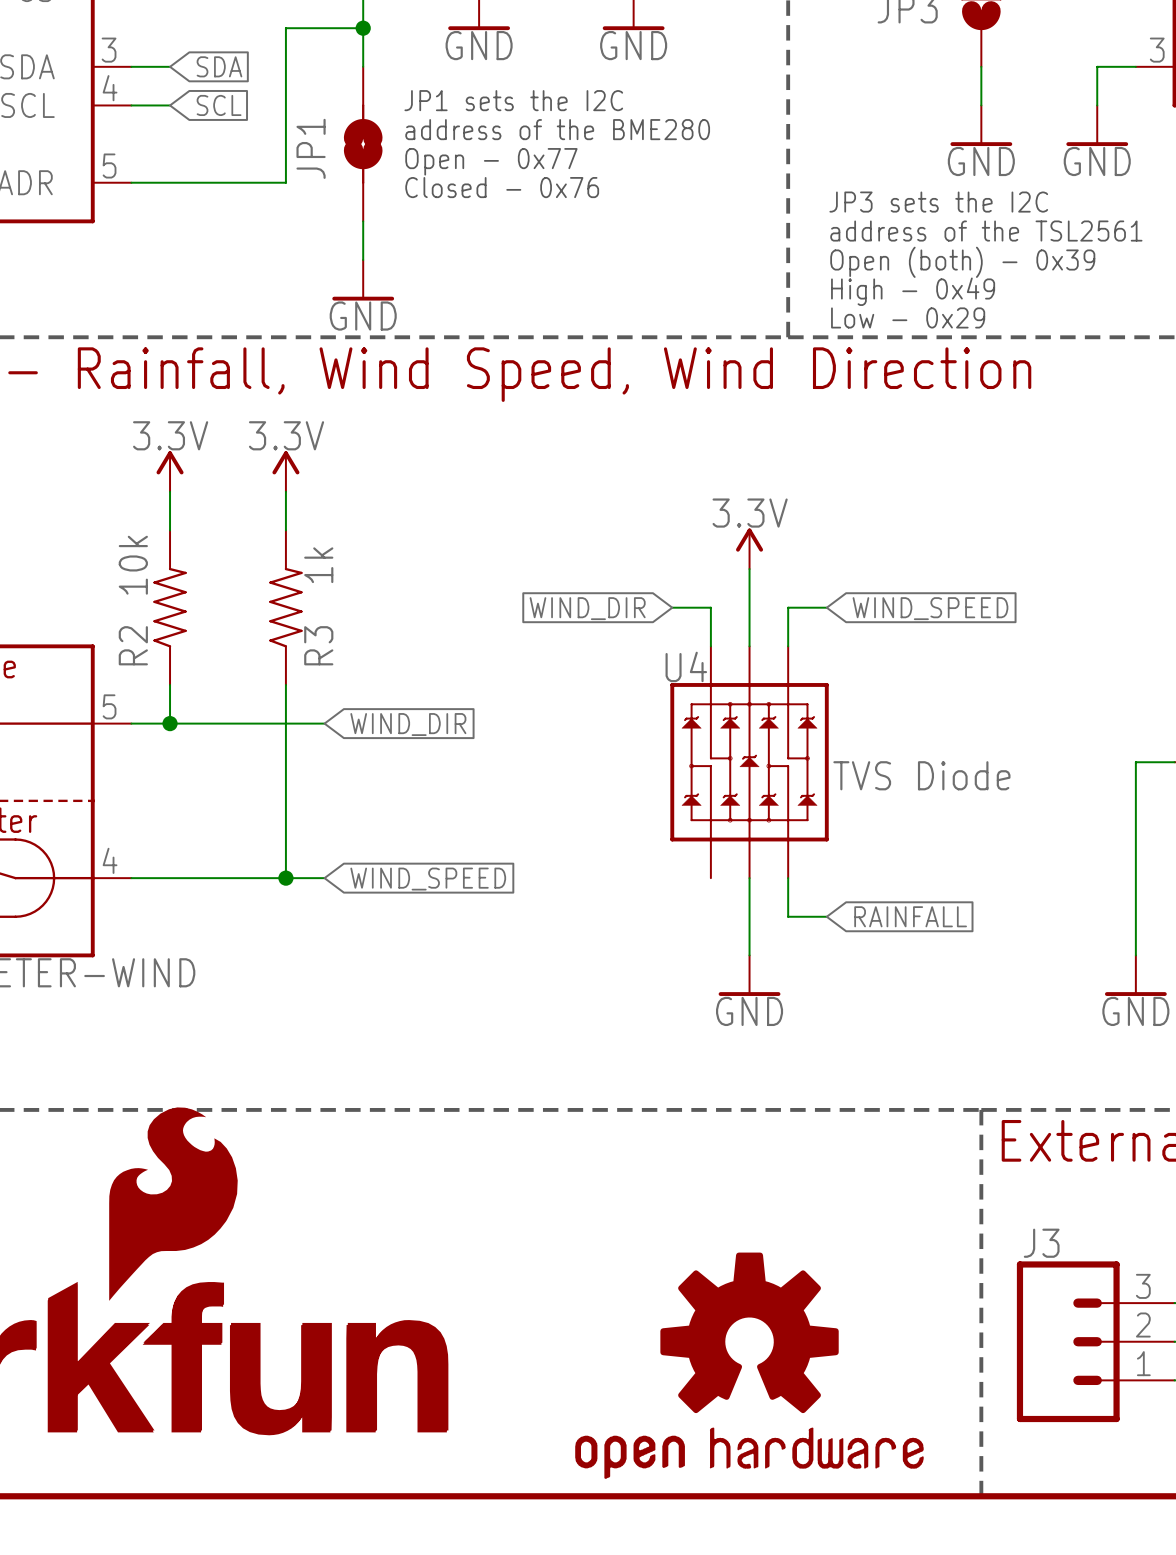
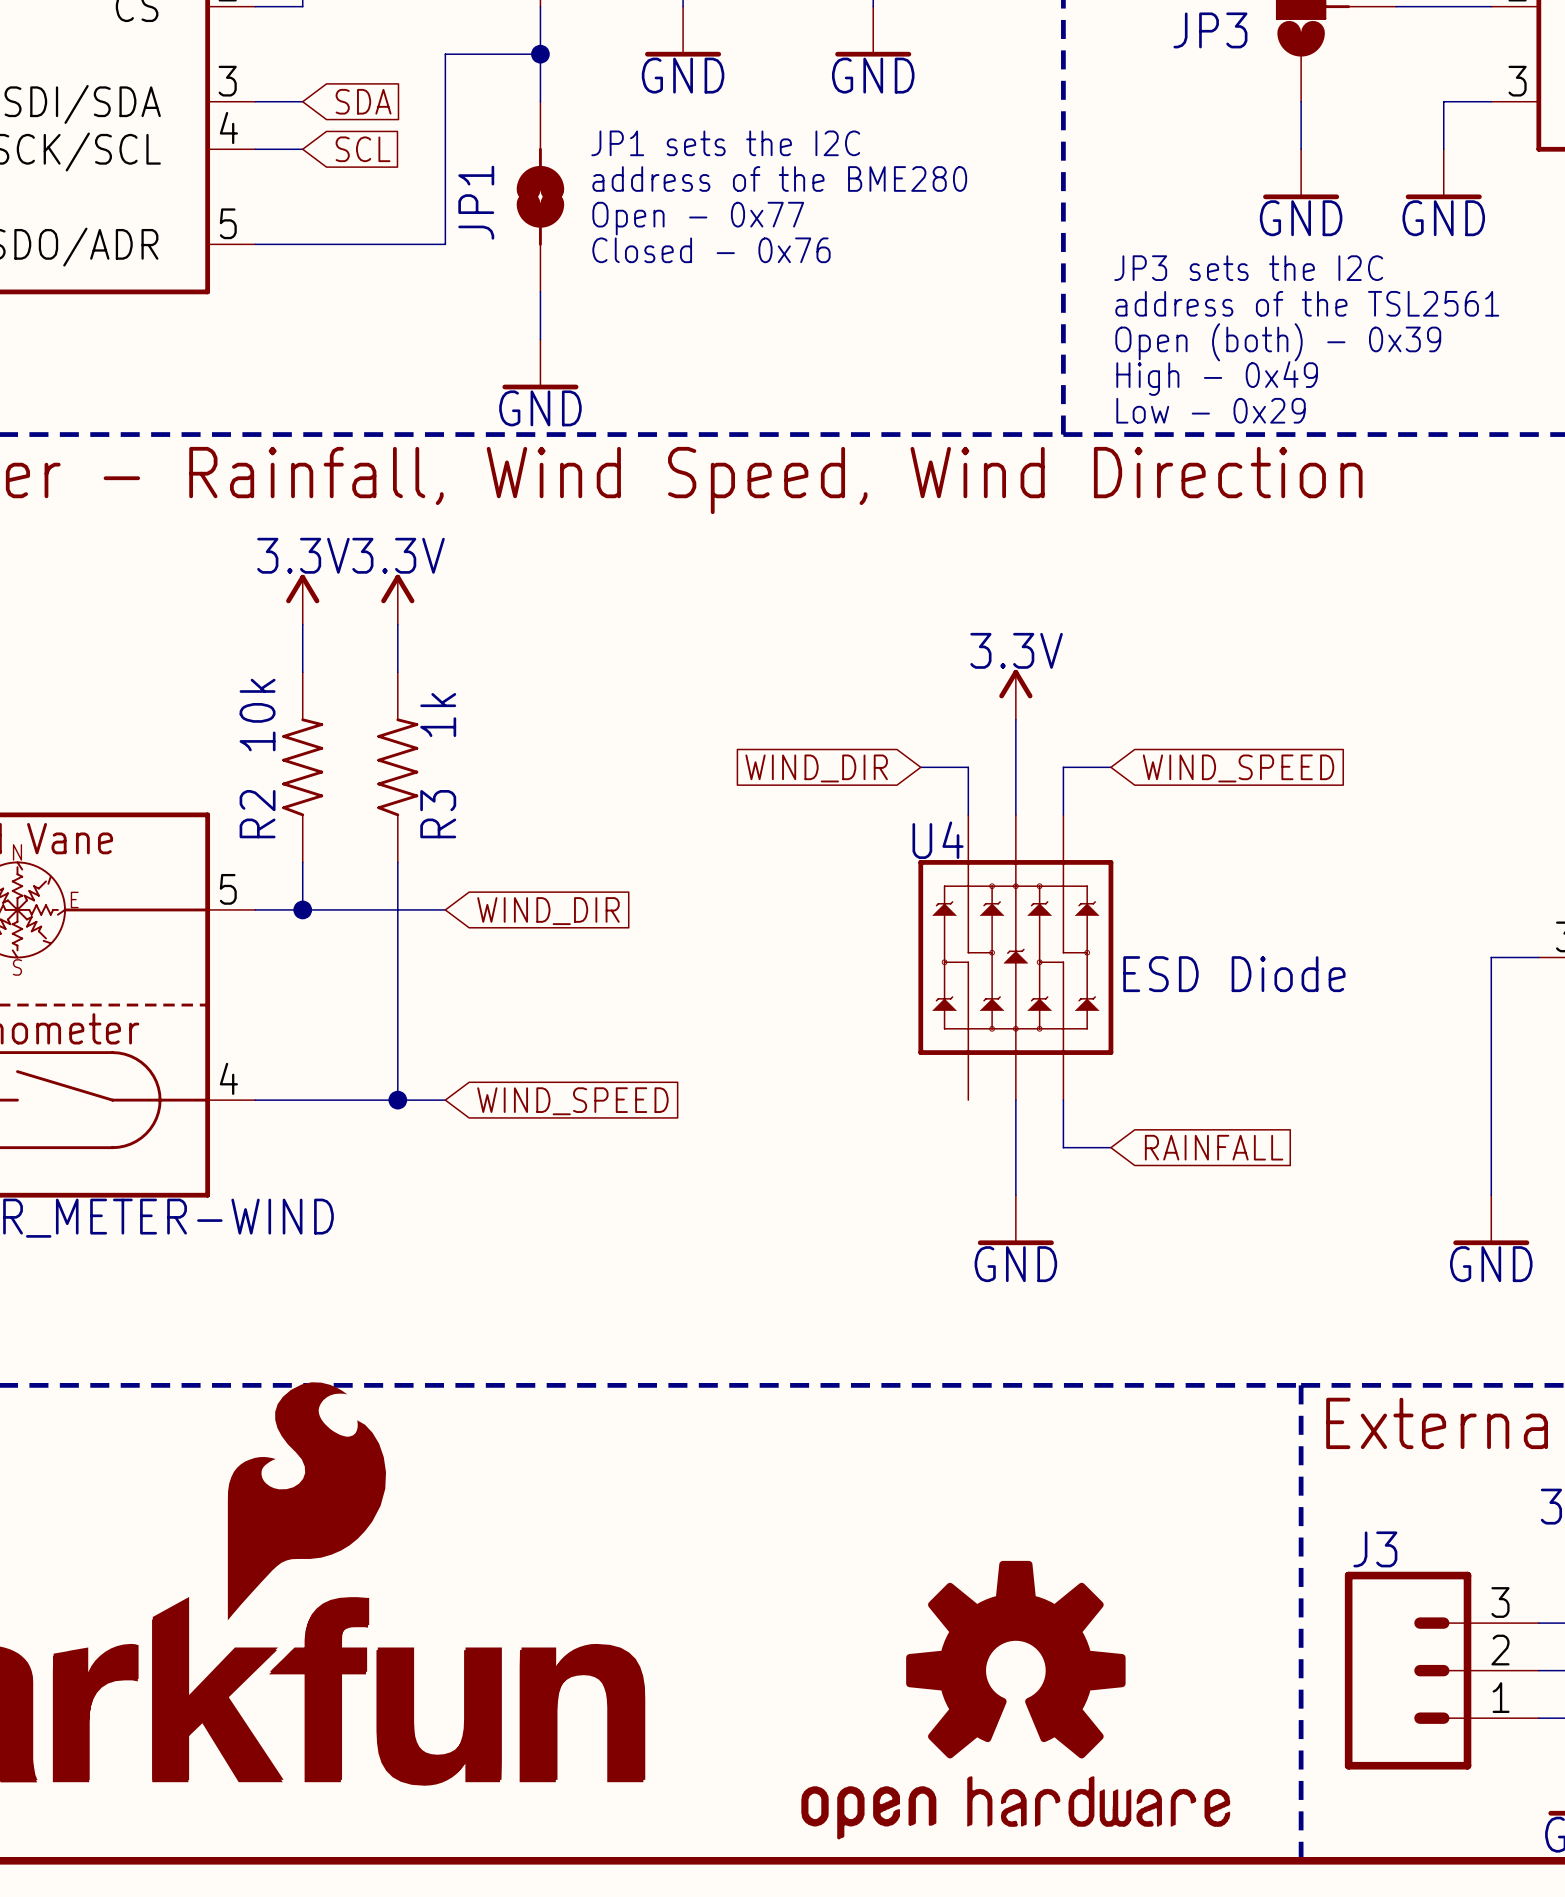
power symbol position: 3.3V (285, 471) -> 3.3V (397, 599)
wire: (285, 491) (285, 530) -> (397, 624) (397, 672)
R3 position: (285, 607) -> (397, 767)
wire: none -> (397, 862) (397, 1100)
wire: (285, 684) (285, 878) (324, 878) -> none
wire: (285, 723) (324, 723) -> none
global label position: WIND_DIR (408, 724) -> WIND_DIR (548, 911)
U4 value: TVS Diode (921, 775) -> ESD Diode (1234, 974)
junction position: (285, 878) -> (397, 1100)
global label position: WIND_SPEED (428, 879) -> WIND_SPEED (572, 1101)

